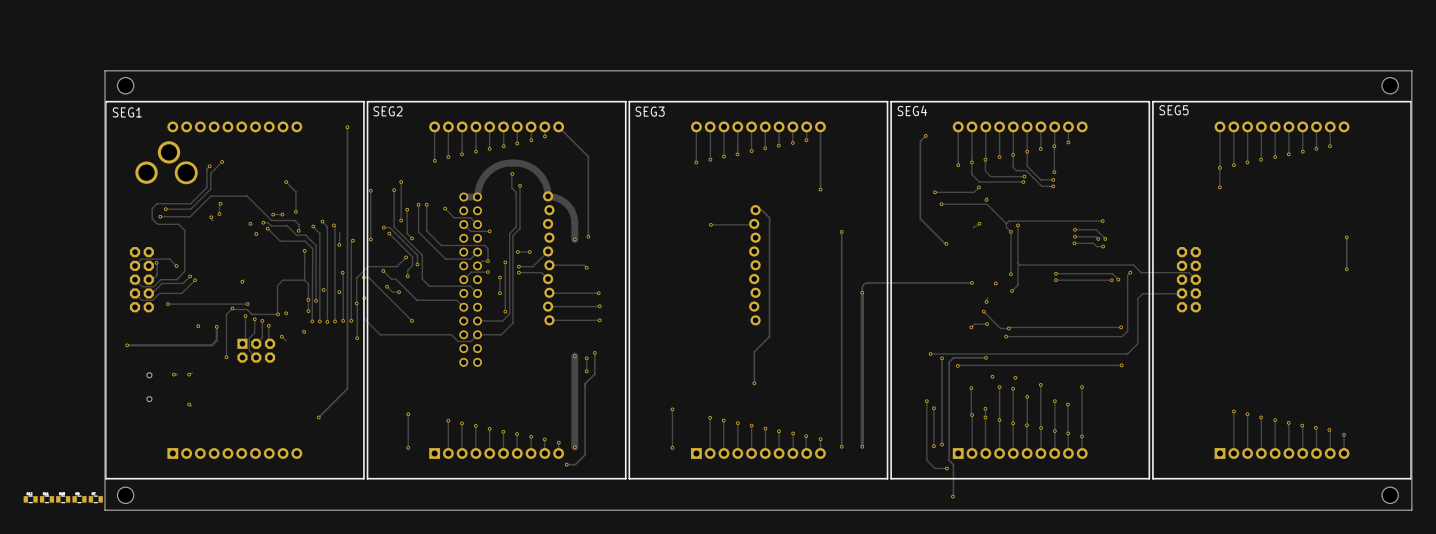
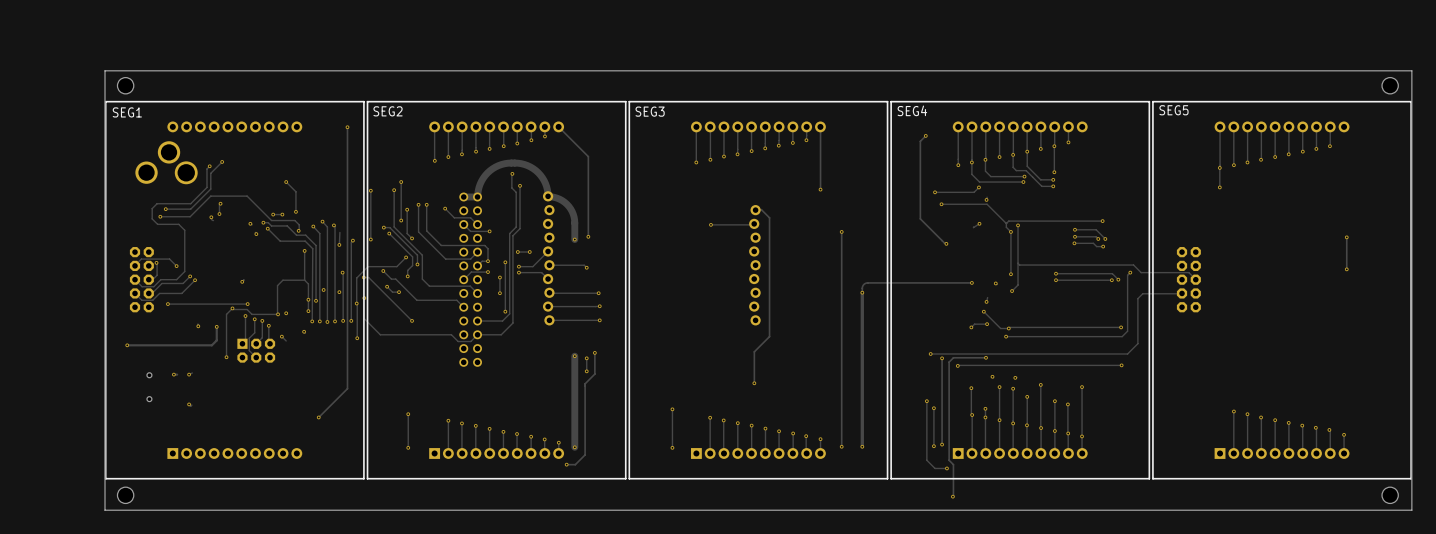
part: (30, 499) -> none
part: (46, 499) -> none
part: (63, 499) -> none
part: (79, 499) -> none
part: (95, 499) -> none

